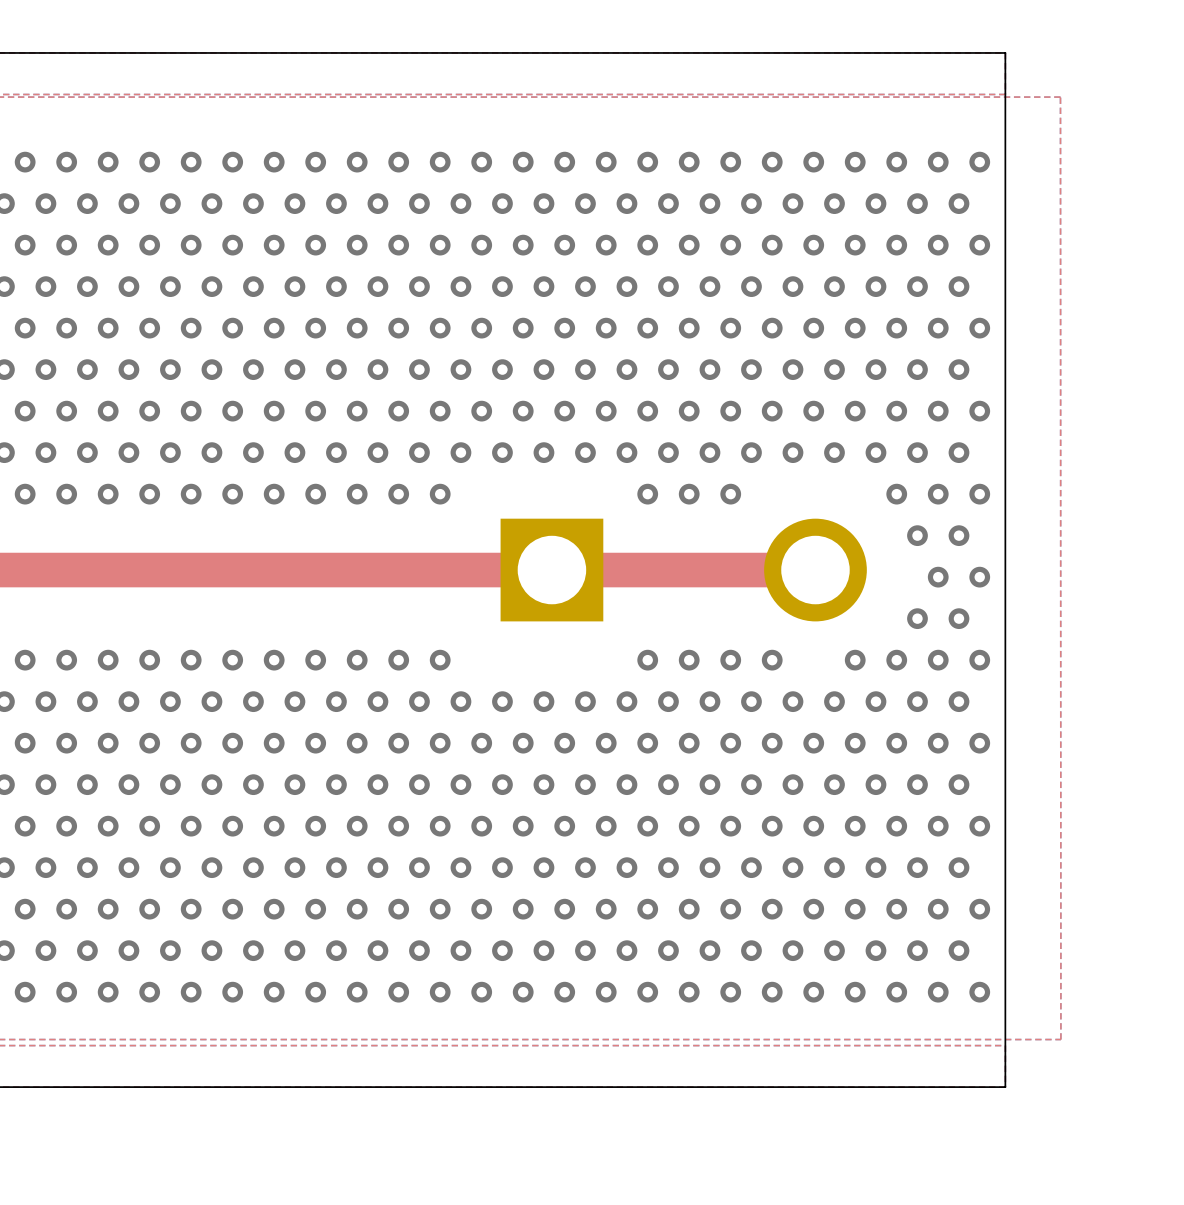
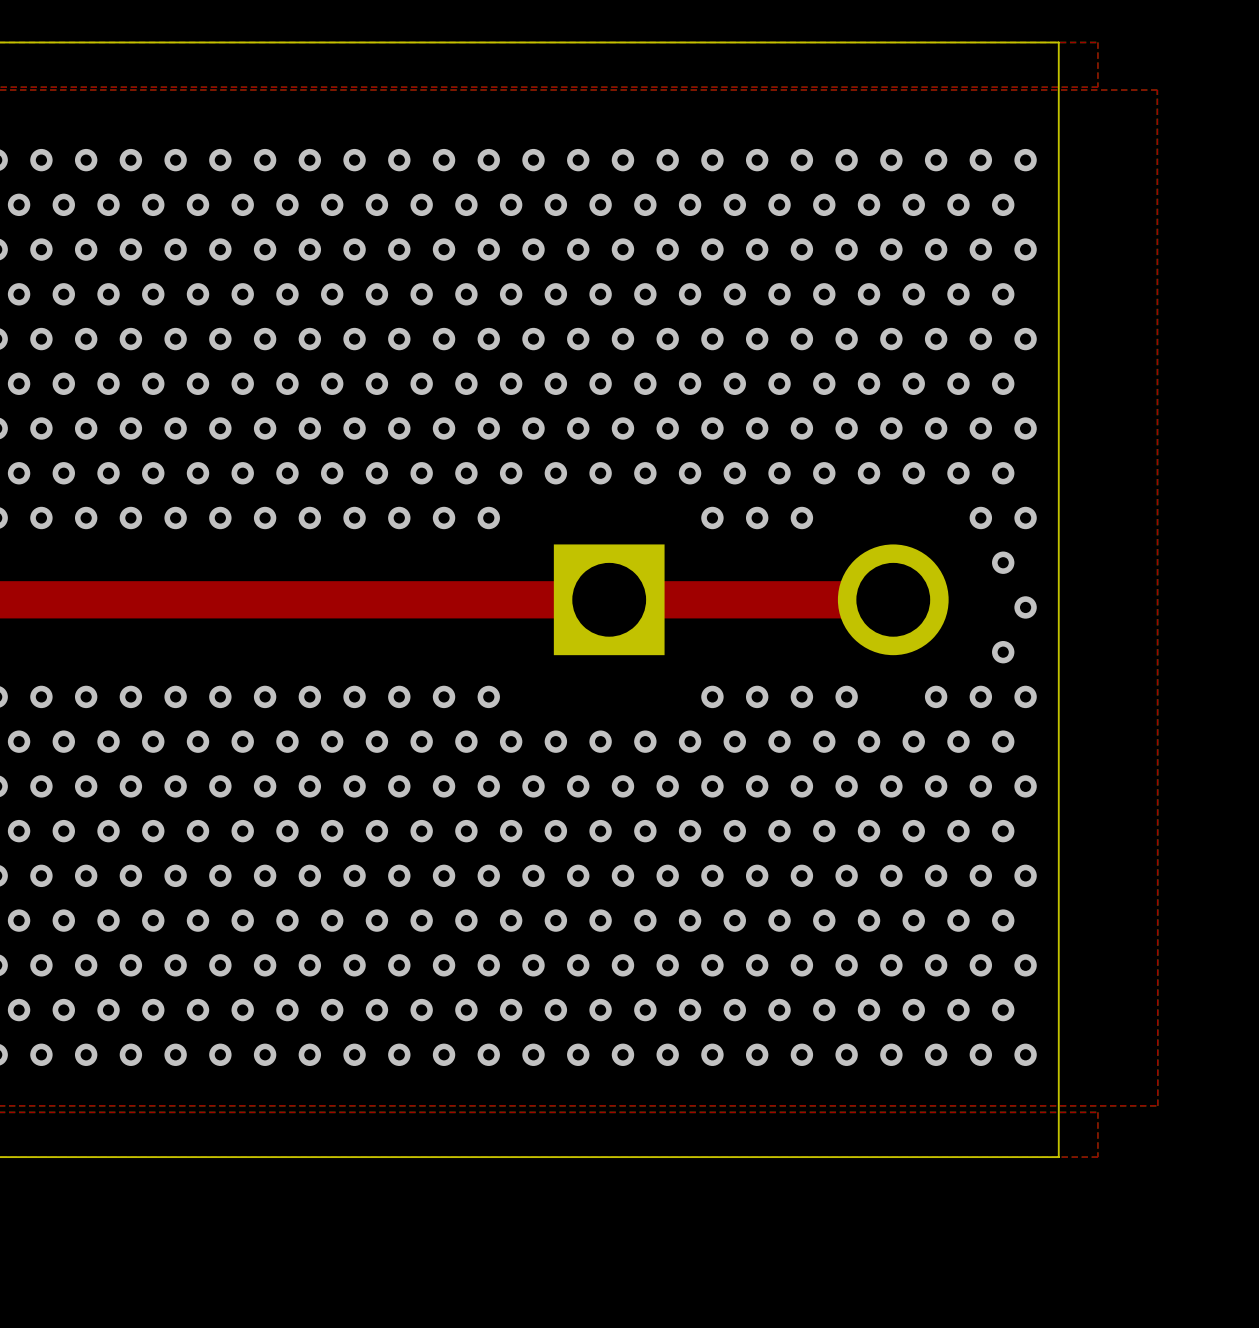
board edge: (969, 52) (1005, 52) (1005, 1087) (969, 1087) -> (1058, 42) (1058, 1157)
via: (979, 162) -> none
via: (958, 203) -> none
via: (979, 245) -> none
via: (958, 286) -> none
via: (979, 328) -> none
via: (958, 369) -> none
via: (979, 411) -> none
via: (958, 452) -> none
via: (979, 494) -> none
via: (958, 535) -> none
via: (979, 577) -> none
via: (958, 618) -> none
via: (979, 660) -> none
via: (958, 701) -> none
via: (979, 743) -> none
via: (958, 784) -> none
via: (979, 826) -> none
via: (958, 867) -> none
via: (979, 909) -> none
via: (958, 950) -> none
via: (979, 992) -> none

